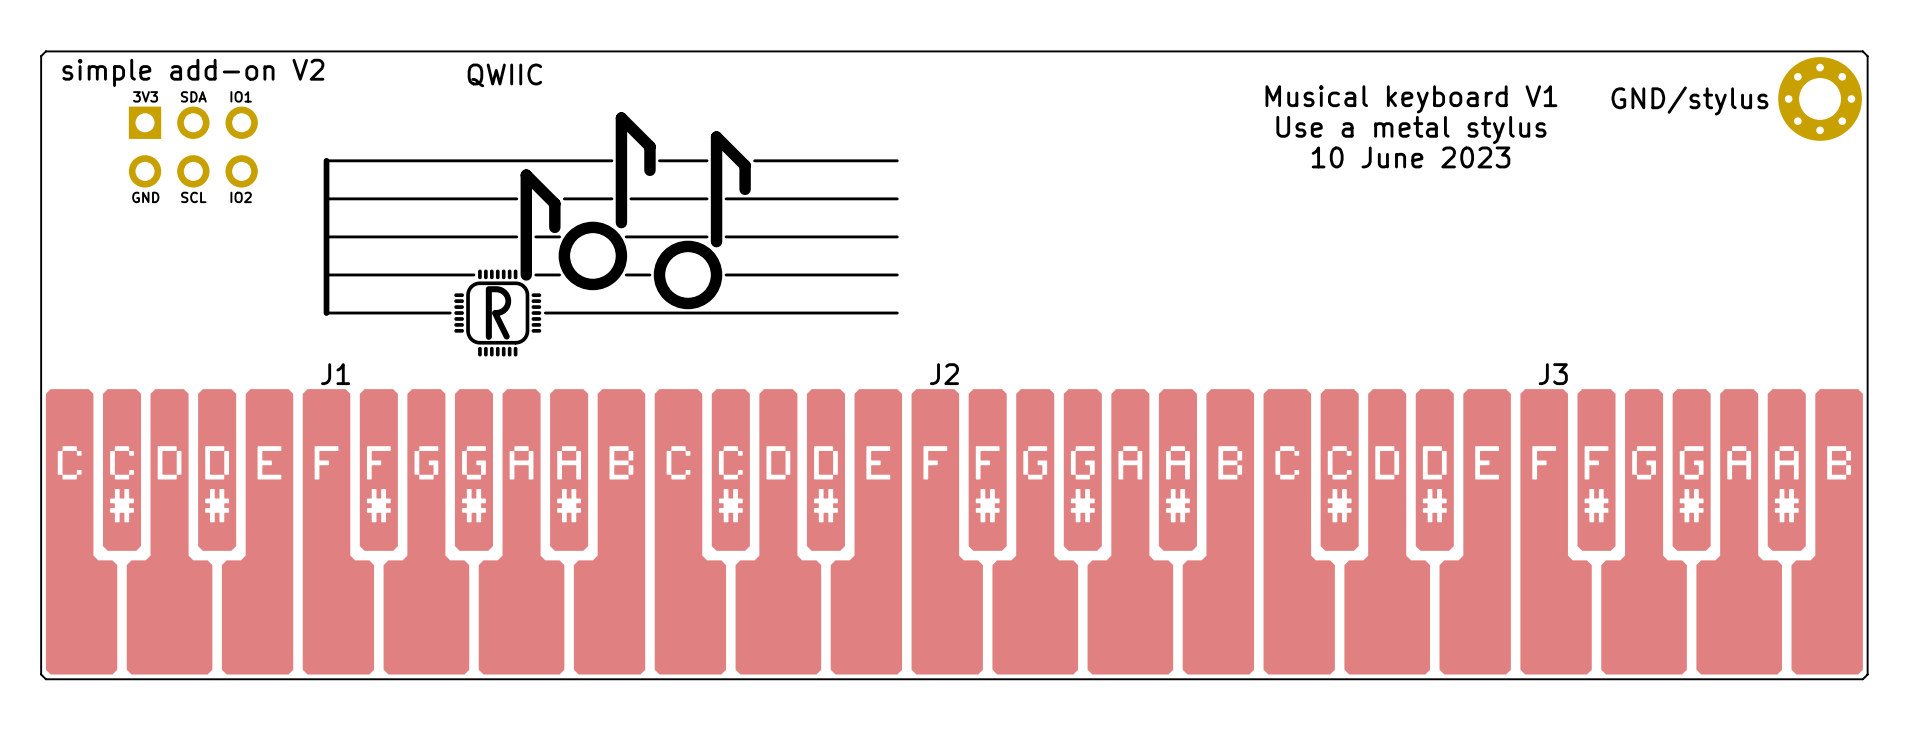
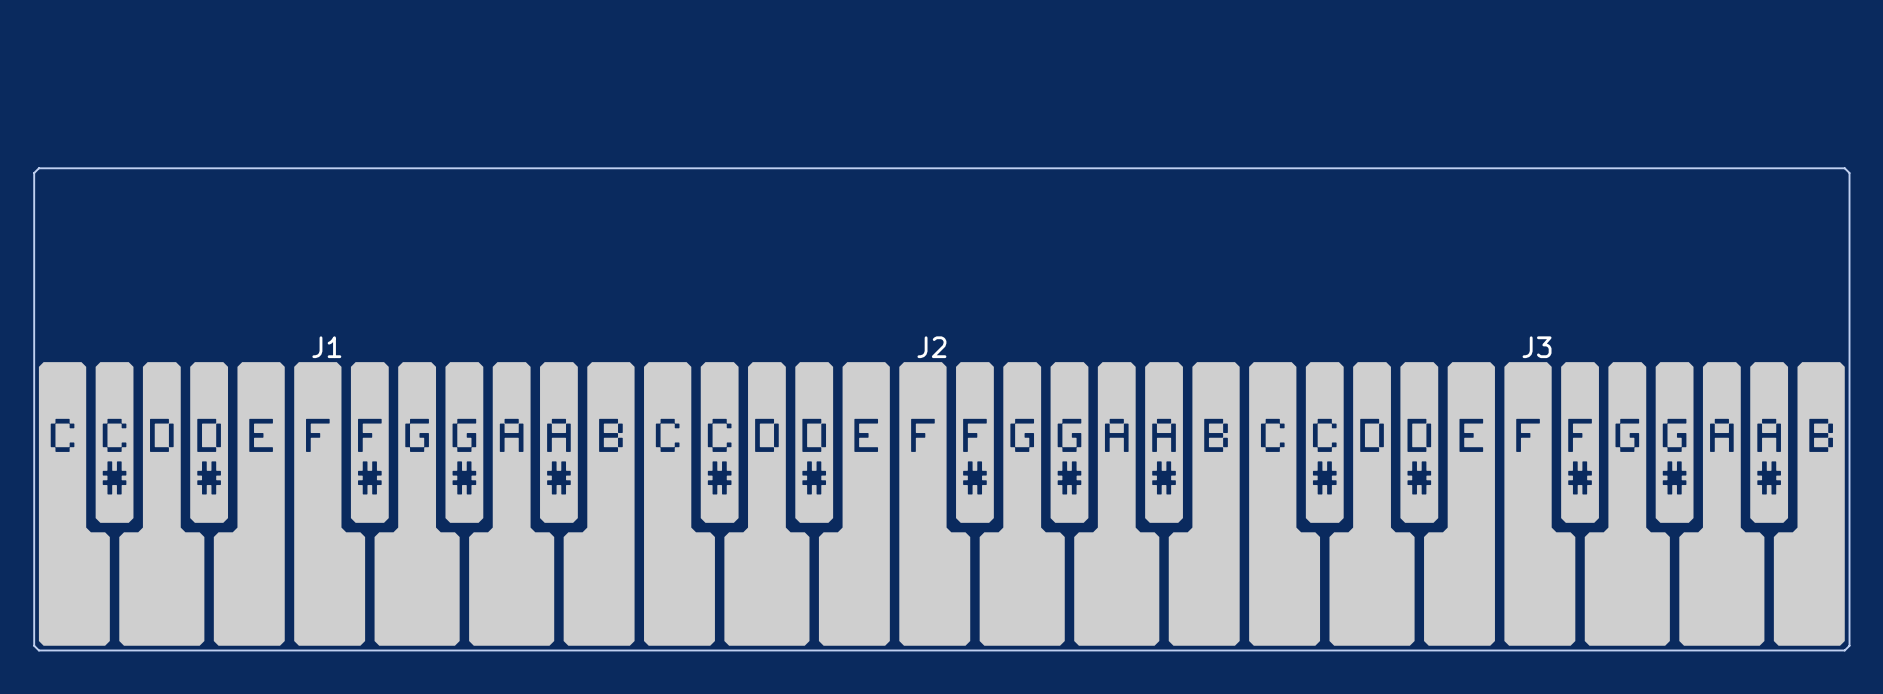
text: simple add-on V2 (193, 72) -> none
text: QWIIC (504, 75) -> none
text: 3V3 (145, 96) -> none
text: SDA (193, 96) -> none
text: IO1 (241, 96) -> none
part: (1820, 98) -> none
text: Musical keyboard V1 (1411, 99) -> none
text: GND/stylus (1689, 100) -> none
text: Use a metal stylus (1411, 129) -> none
part: (193, 147) -> none
text: 10 June 2023 (1411, 157) -> none
line: (611, 160) (326, 160) (326, 313) (450, 313) -> none
line: (659, 160) (707, 160) -> none
line: (754, 160) (897, 160) -> none
line: (649, 170) (649, 146) (621, 118) (621, 222) -> none
line: (745, 189) (745, 165) (716, 137) (716, 241) -> none
text: GND (145, 197) -> none
text: SCL (193, 197) -> none
text: IO2 (241, 197) -> none
board edge: (41, 198) (41, 56) (45, 51) (1862, 51) (1867, 56) (1867, 198) -> (34, 173) (38, 168) (1844, 168) (1849, 173)
line: (326, 198) (516, 198) -> none
line: (564, 198) (611, 198) -> none
line: (630, 198) (707, 198) -> none
line: (726, 198) (897, 198) -> none
drawing: [454, 221, 628, 357] -> none
line: (554, 227) (554, 203) (526, 175) (526, 274) -> none
line: (326, 236) (516, 236) -> none
line: (535, 236) (559, 236) -> none
line: (626, 236) (707, 236) -> none
line: (726, 236) (897, 236) -> none
drawing: [653, 240, 723, 310] -> none
line: (326, 274) (473, 274) -> none
line: (535, 274) (559, 274) -> none
line: (626, 274) (649, 274) -> none
line: (726, 274) (897, 274) -> none
line: (545, 313) (897, 313) -> none

